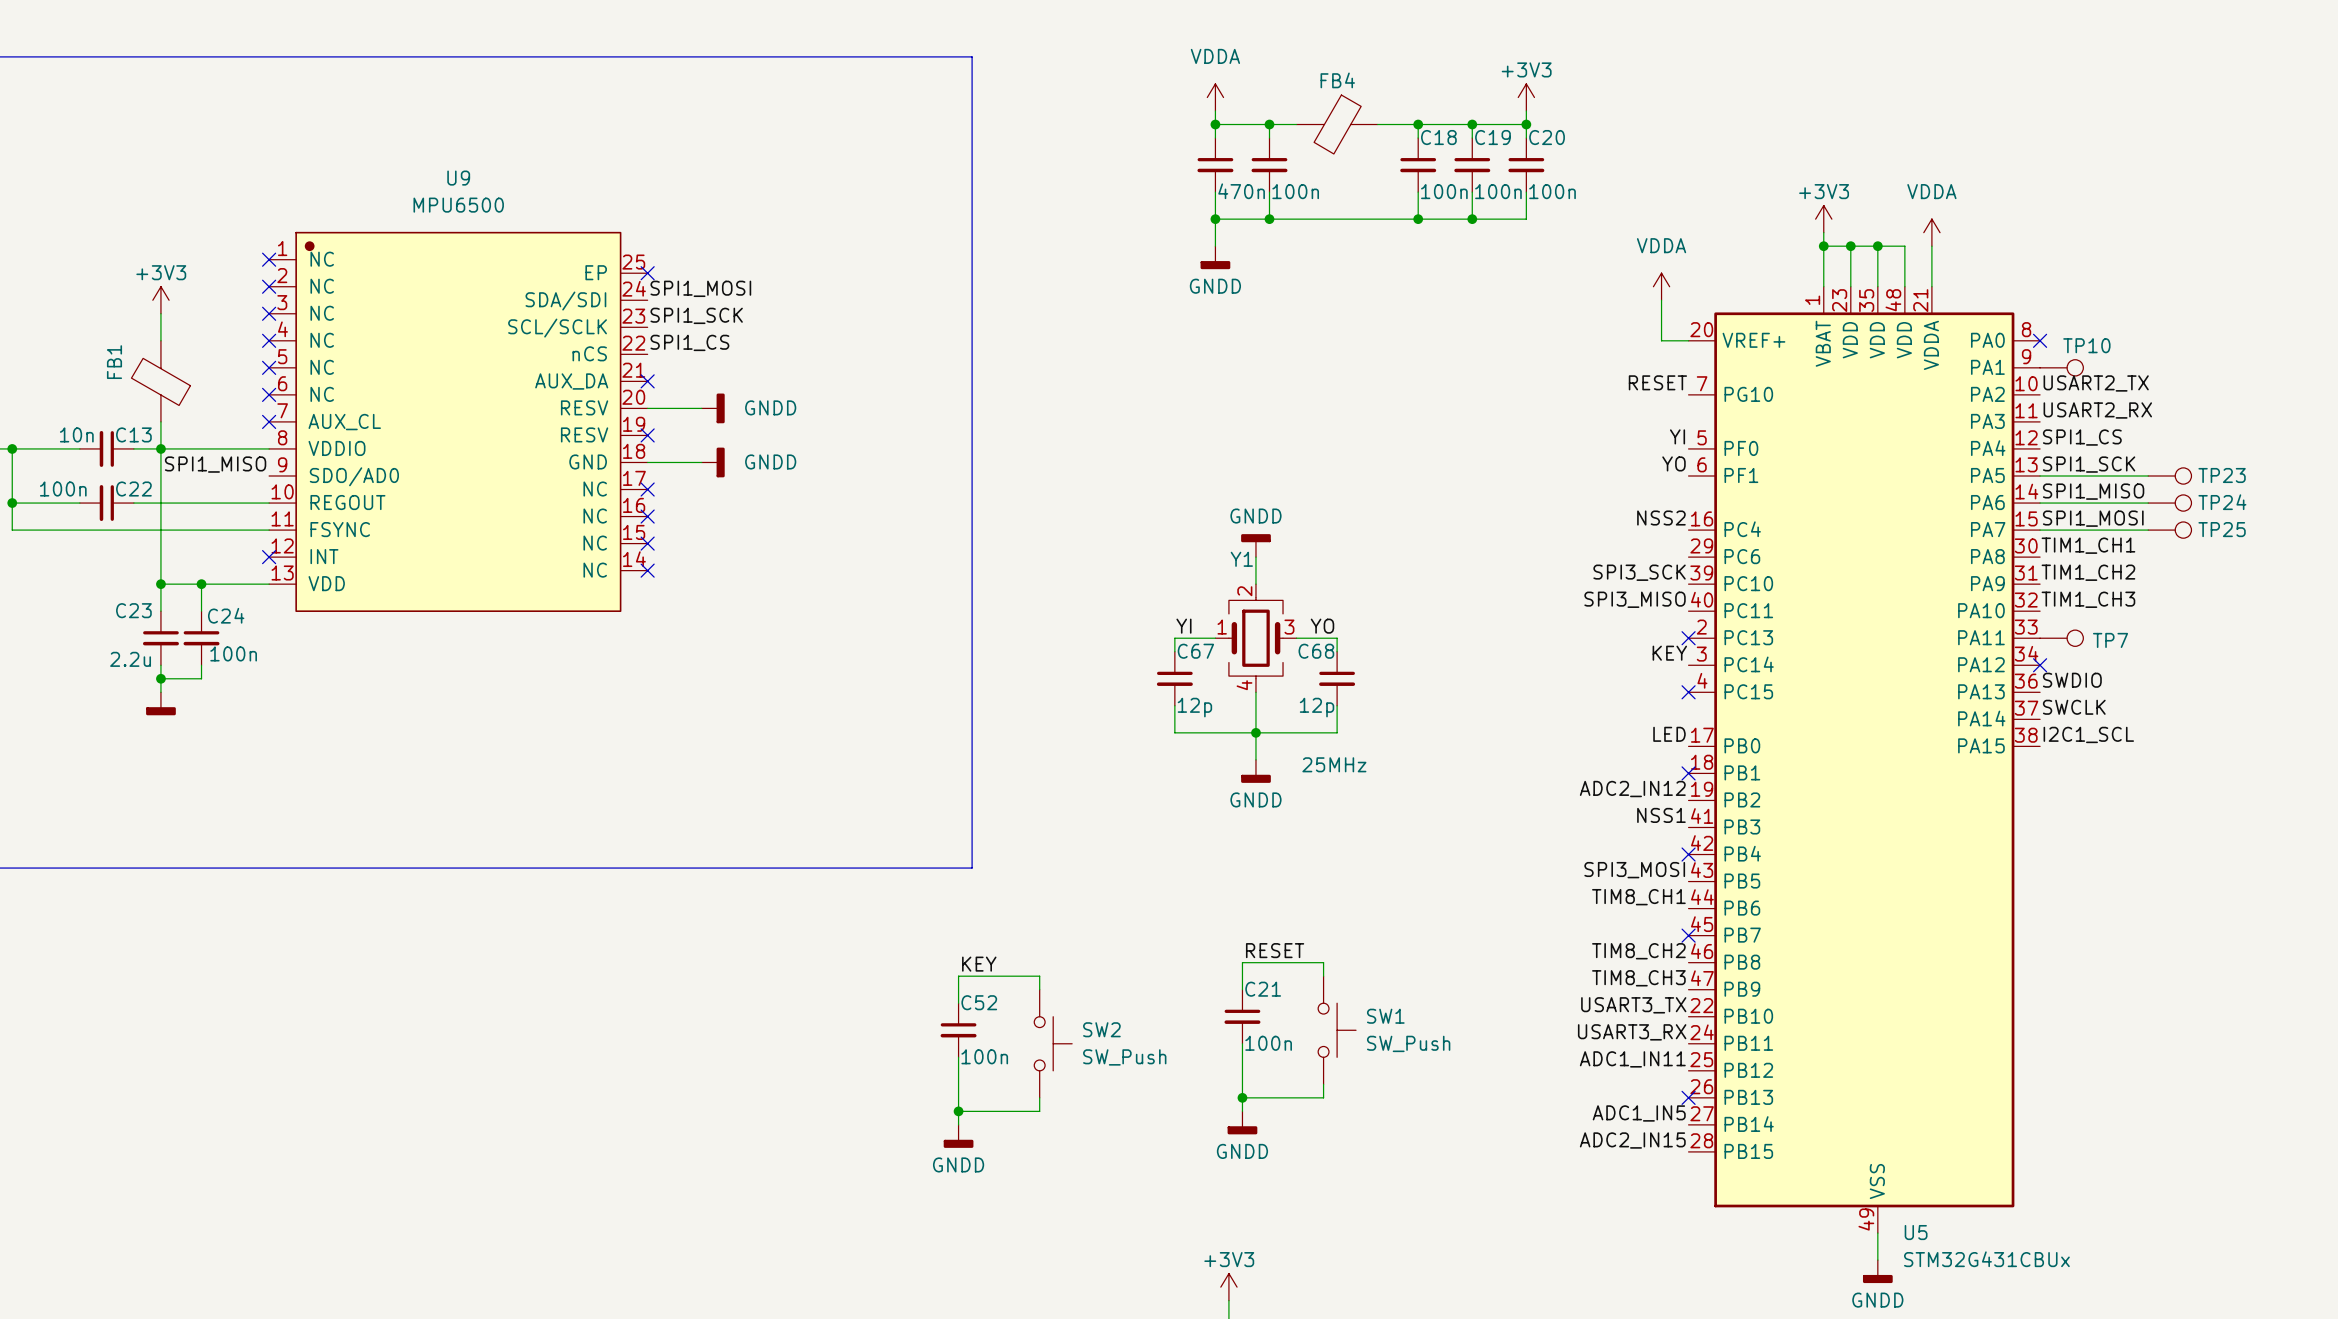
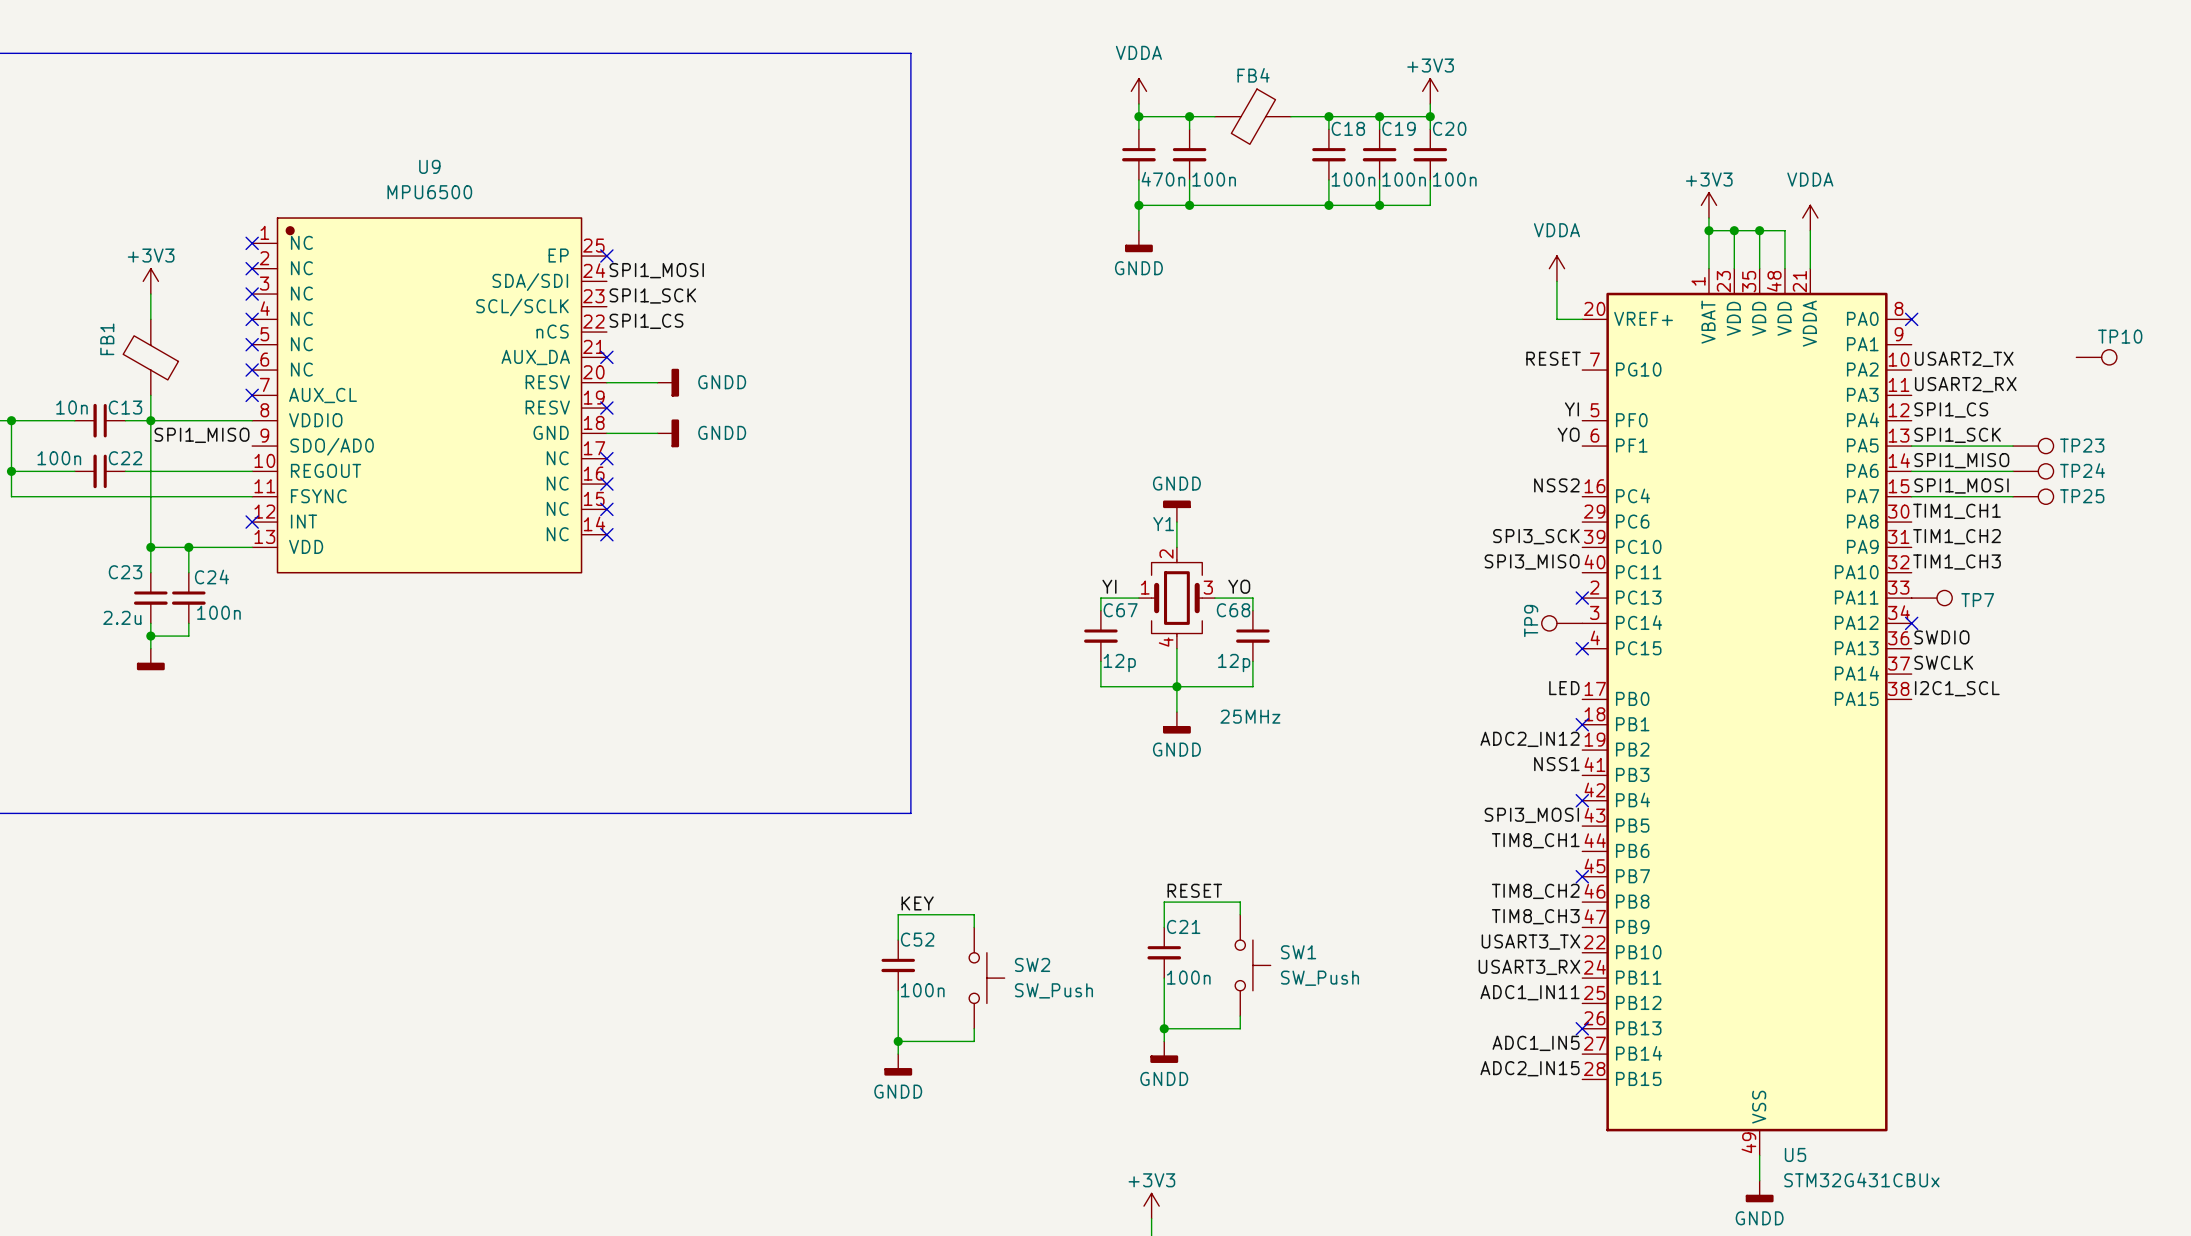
TP10 position: (2061, 367) -> (2096, 357)
label: KEY (1669, 653) -> none
TP9: none -> (1562, 623)

